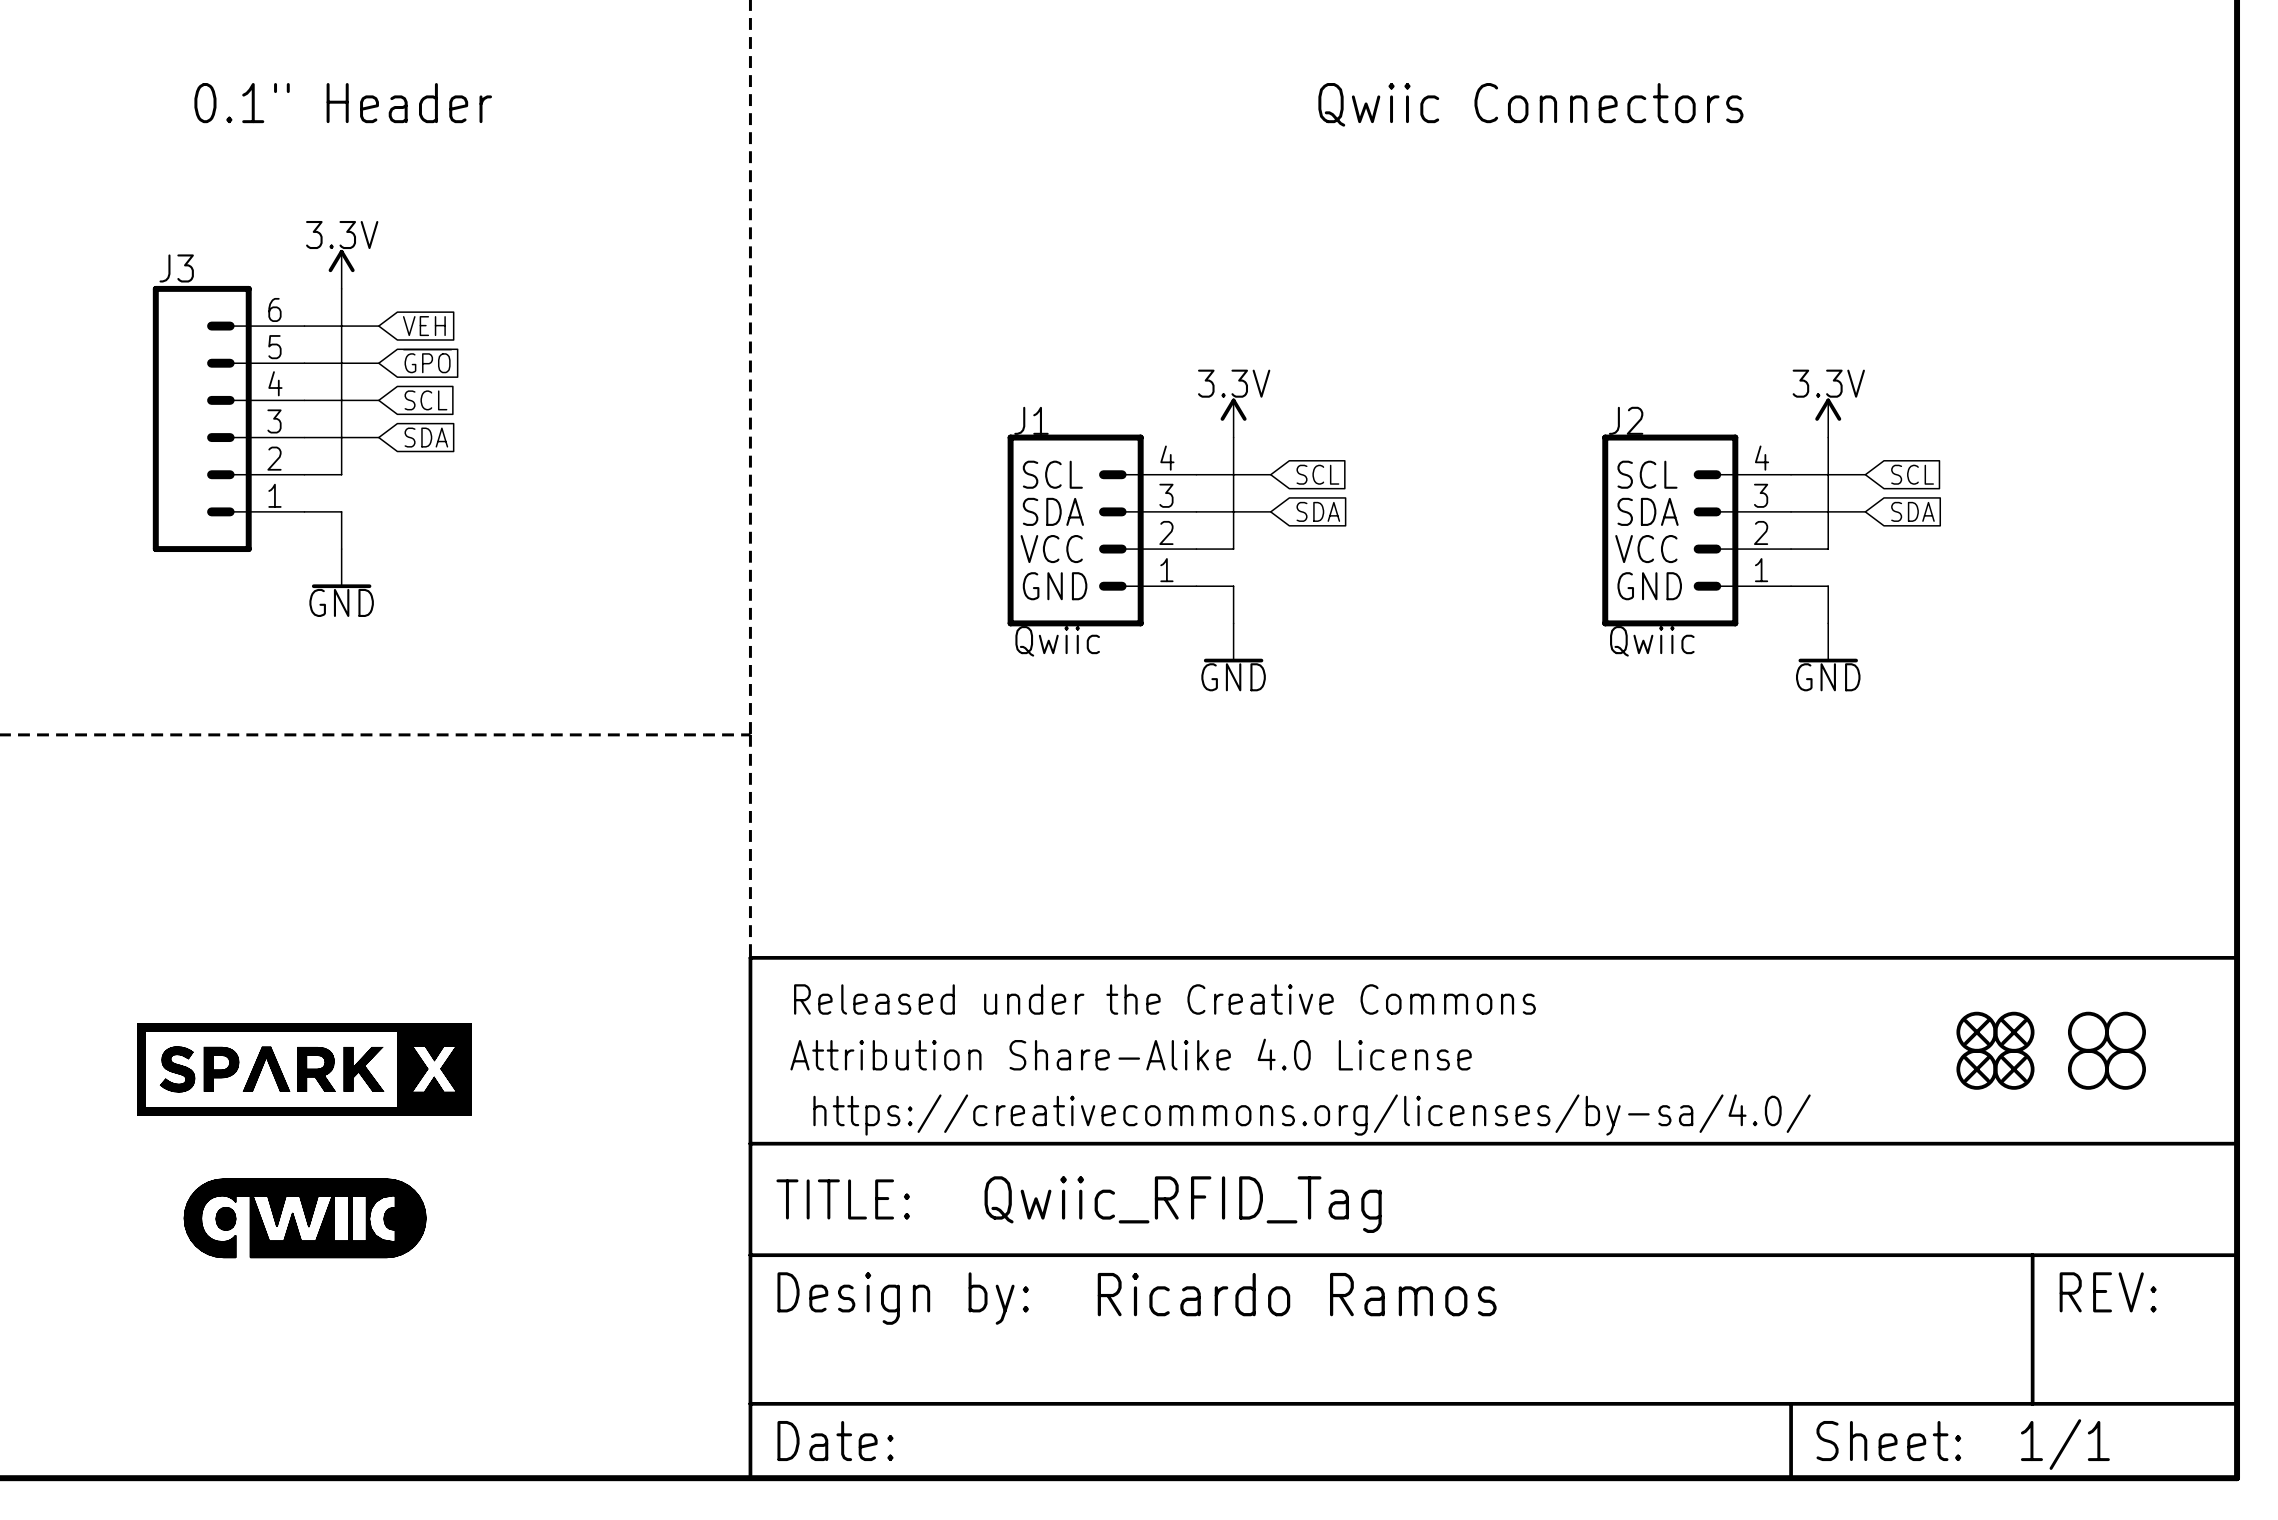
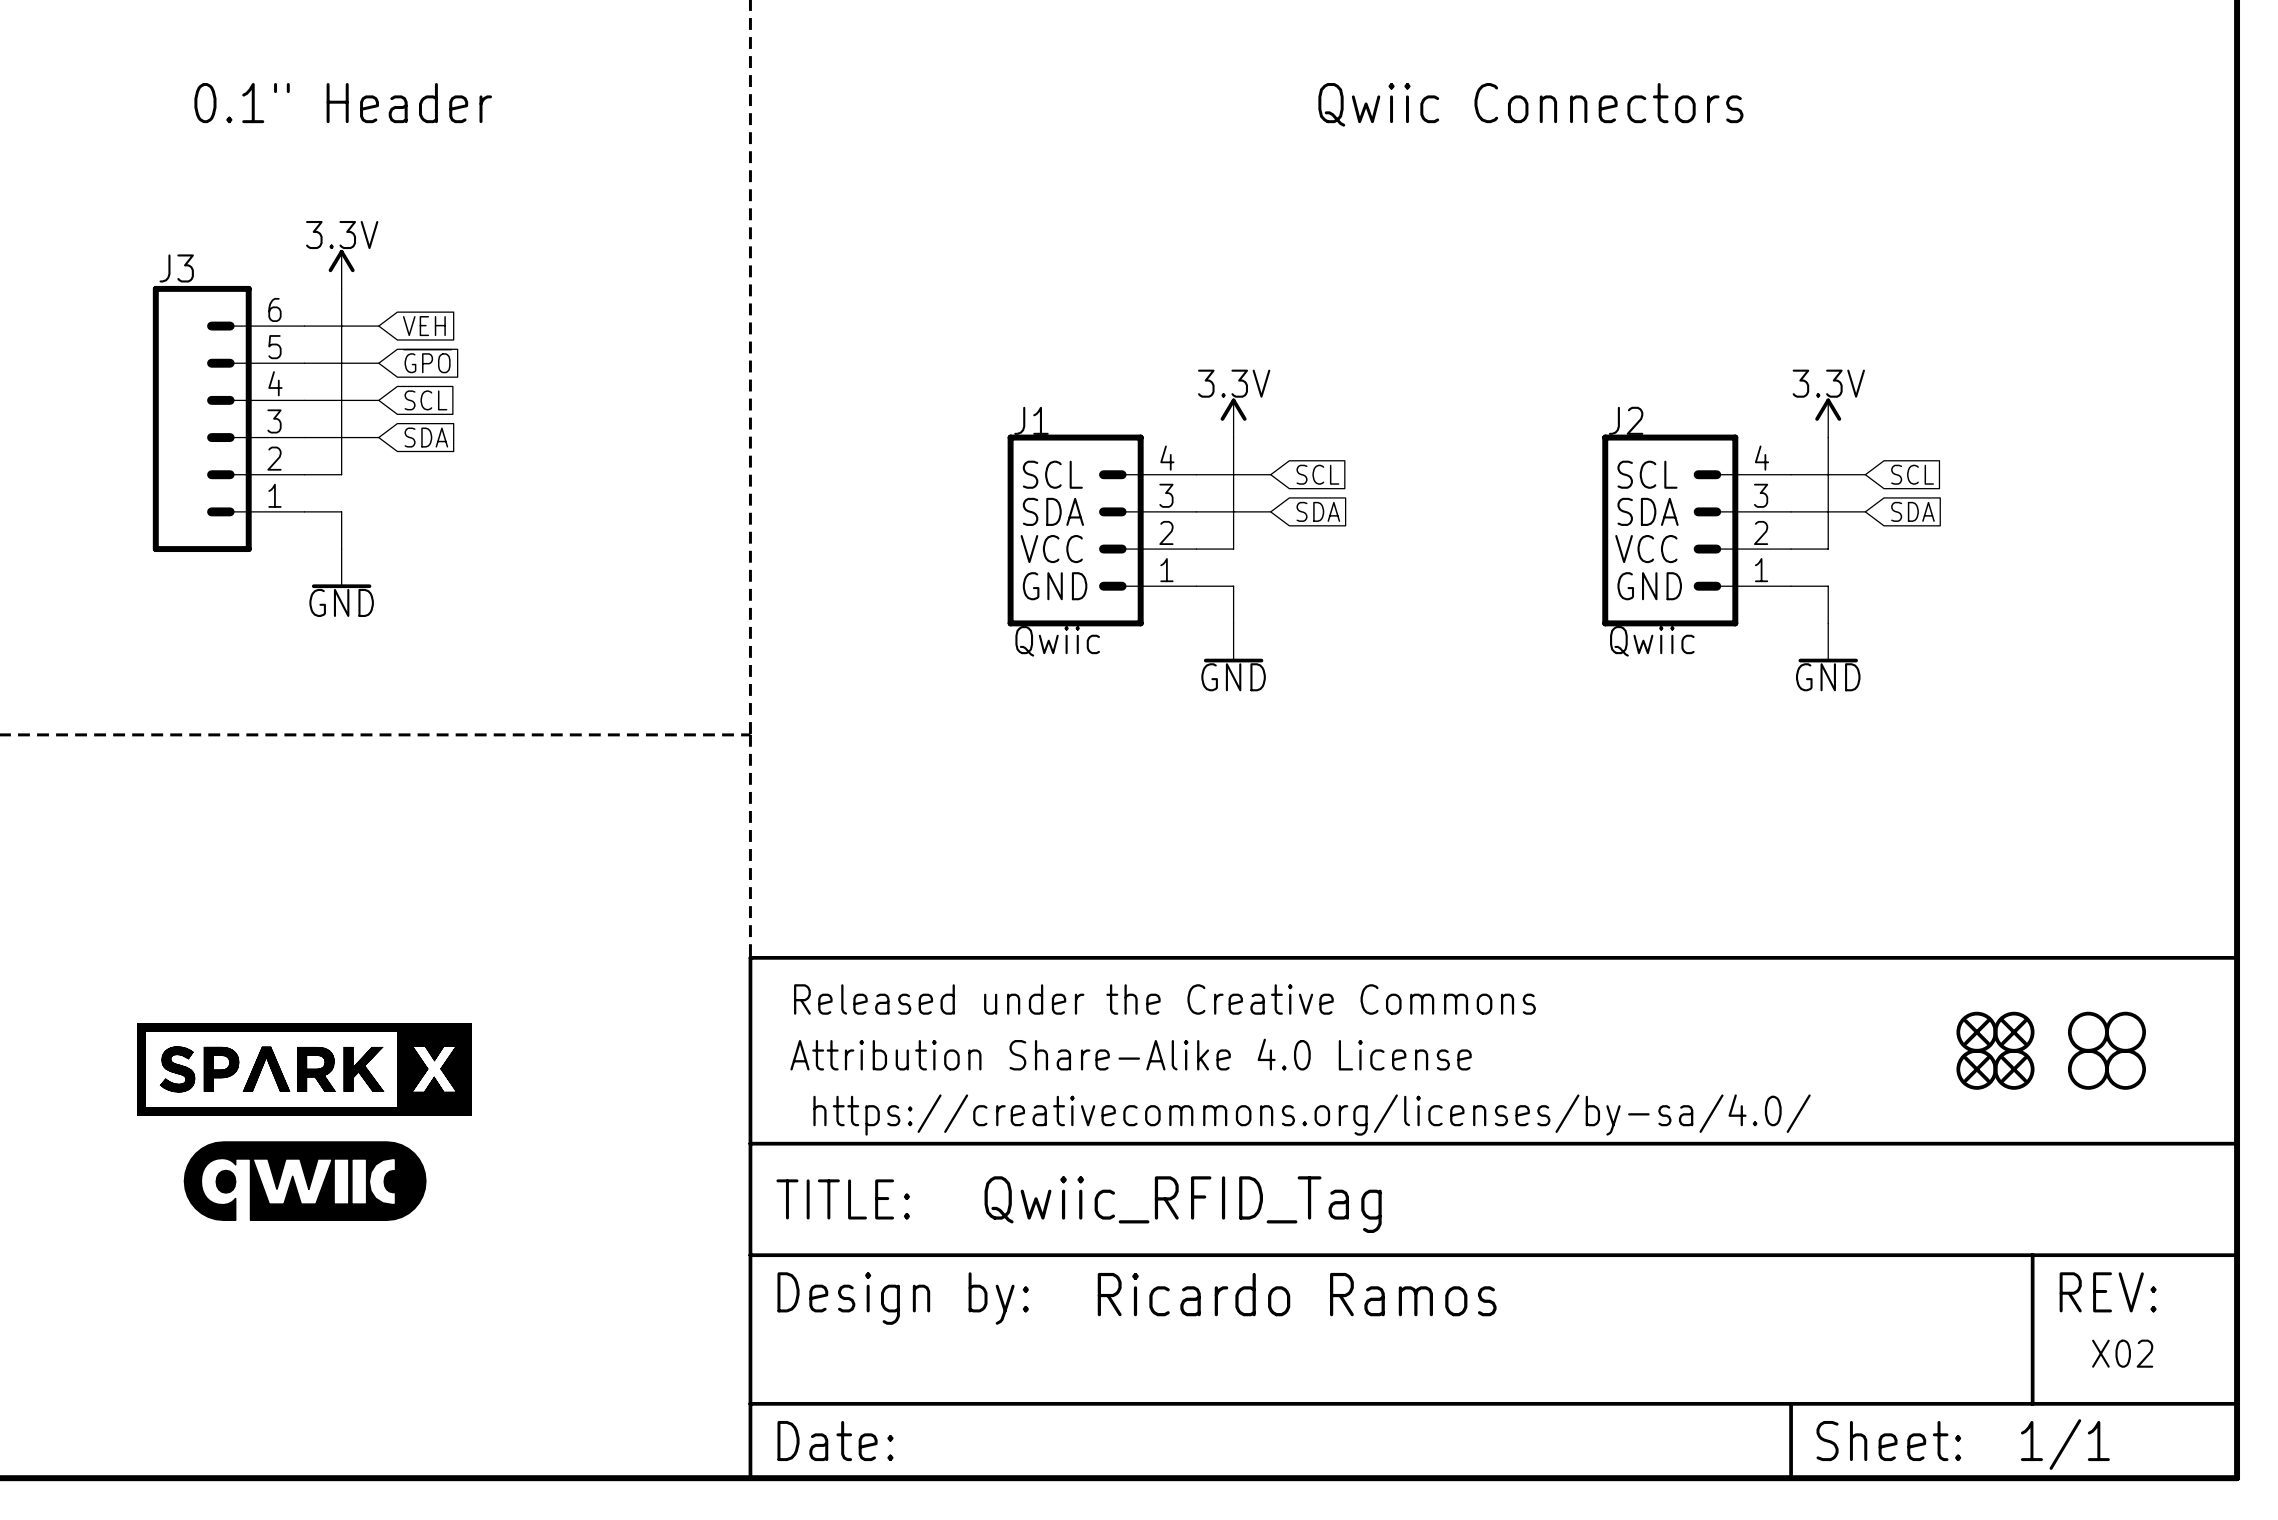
part position: (305, 1218) -> (305, 1181)
part text: none -> X02 (2122, 1353)

